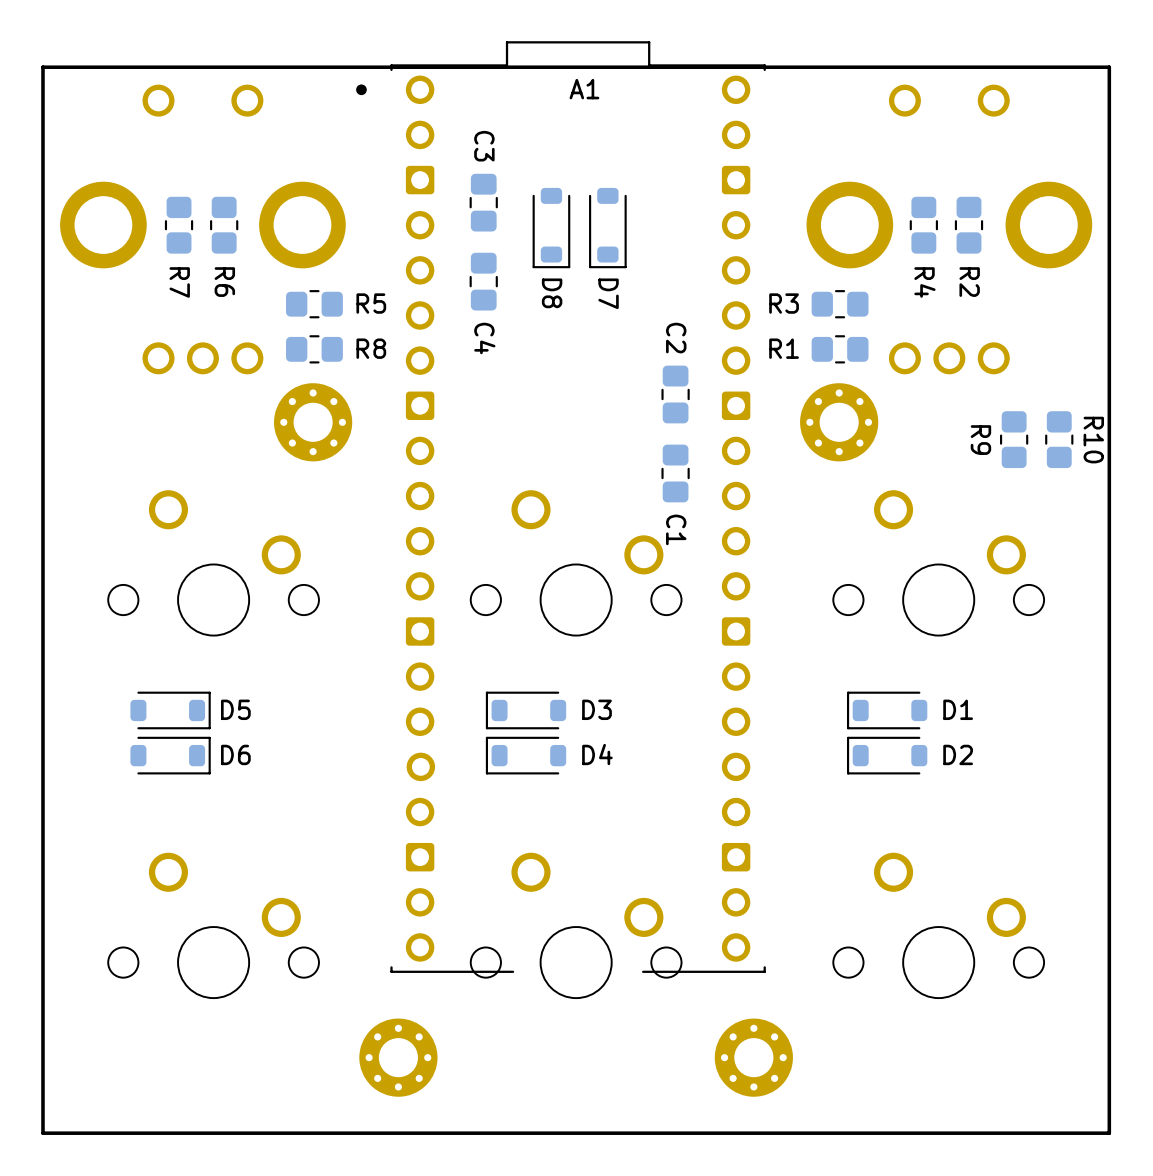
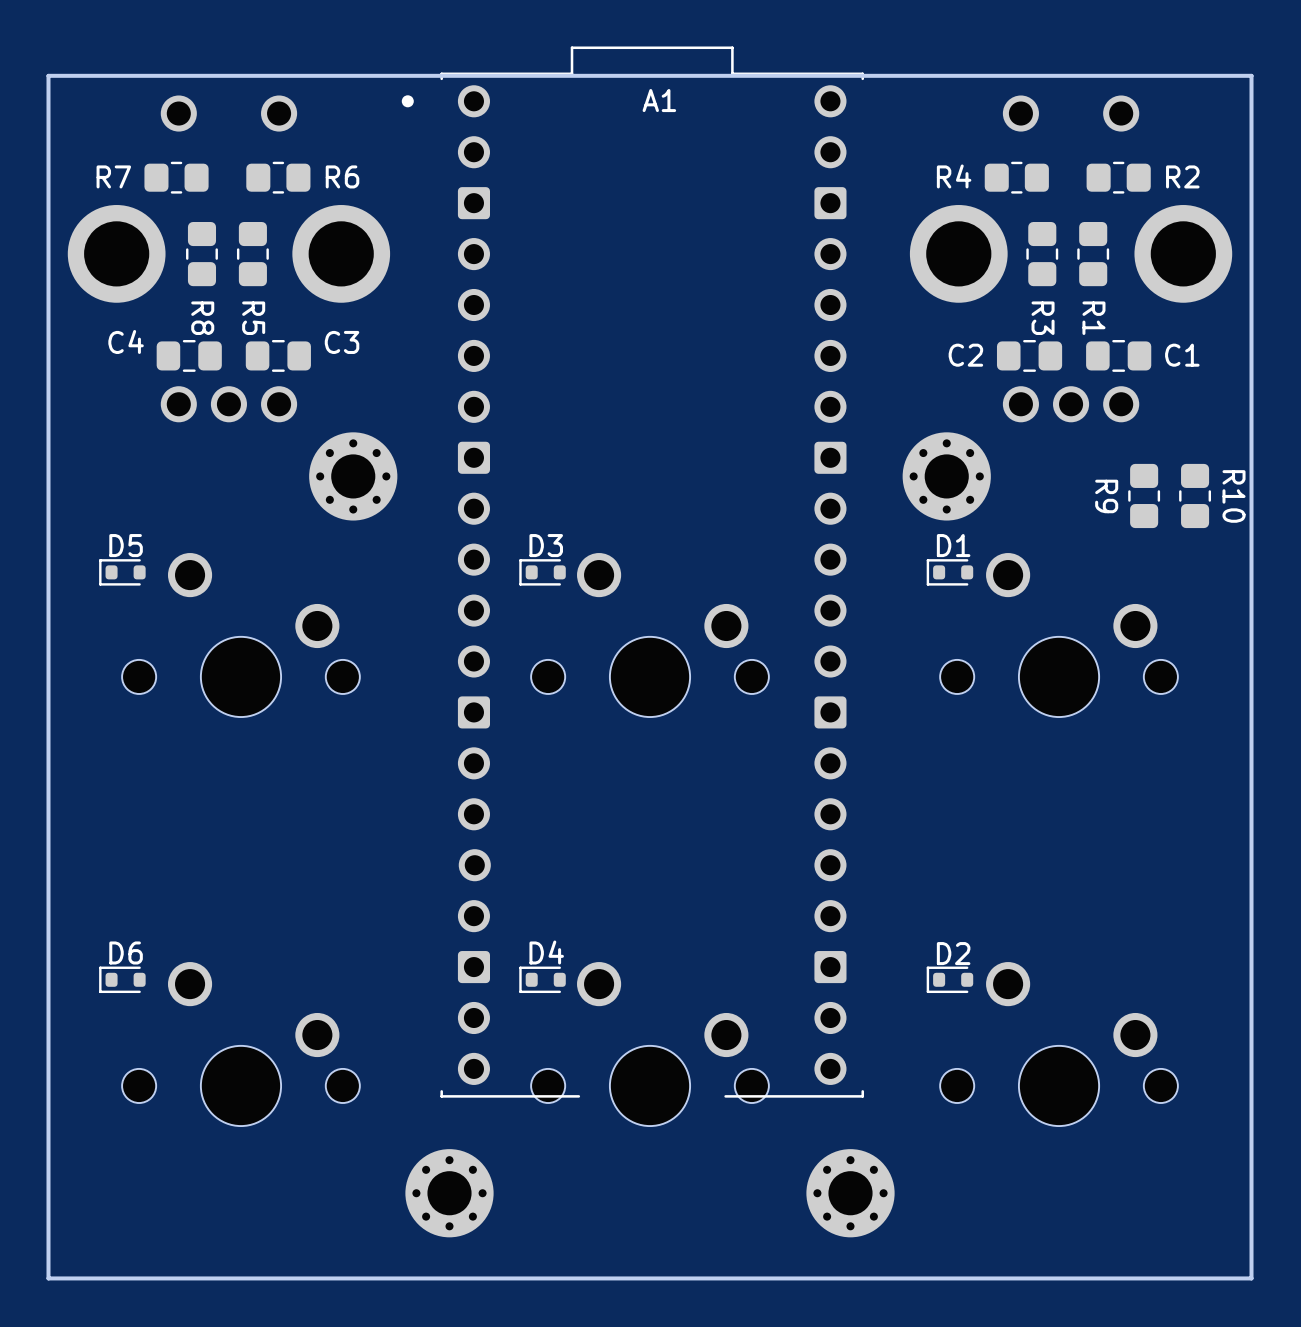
R7: none -> (176, 177)
R6: none -> (278, 177)
R4: none -> (1016, 177)
R2: none -> (1118, 177)
C3 rotation: 0° (483, 202) -> 90° clockwise (278, 355)
C3 position: (483, 202) -> (278, 355)
D8: (551, 228) -> none
D7: (607, 228) -> none
C4 rotation: 0° (483, 281) -> 90° clockwise (189, 355)
C4 position: (483, 281) -> (189, 355)
R7 name: R7 (179, 282) -> R8 (202, 318)
R6 name: R6 (224, 282) -> R5 (253, 318)
R4 name: R4 (924, 282) -> R3 (1043, 318)
R2 name: R2 (969, 282) -> R1 (1093, 318)
R5: (314, 304) -> none
R3: (840, 304) -> none
C2 name position: C2 (676, 338) -> C2 (965, 355)
R8: (314, 349) -> none
R1: (840, 349) -> none
C2 rotation: 0° (675, 394) -> 90° clockwise (1029, 355)
C2 position: (675, 394) -> (1029, 355)
C1 rotation: 0° (675, 473) -> 90° clockwise (1118, 355)
C1 position: (675, 473) -> (1118, 355)
C1 name position: C1 (676, 529) -> C1 (1182, 355)
D5 footprint: [130, 691, 211, 730] -> [99, 559, 146, 586]
D3 footprint: [485, 691, 567, 730] -> [519, 559, 566, 586]
D1 footprint: [846, 691, 928, 730] -> [926, 559, 974, 586]
D5 name position: D5 (235, 709) -> D5 (126, 545)
D3 name position: D3 (597, 709) -> D3 (546, 545)
D1 name position: D1 (958, 709) -> D1 (953, 545)
D6 footprint: [130, 736, 211, 775] -> [99, 966, 146, 994]
D4 footprint: [485, 736, 567, 775] -> [519, 966, 566, 994]
D2 footprint: [846, 736, 928, 775] -> [926, 966, 974, 994]
D6 name position: D6 (235, 754) -> D6 (126, 952)
D4 name position: D4 (597, 754) -> D4 (546, 952)
D2 name position: D2 (958, 754) -> D2 (953, 953)

